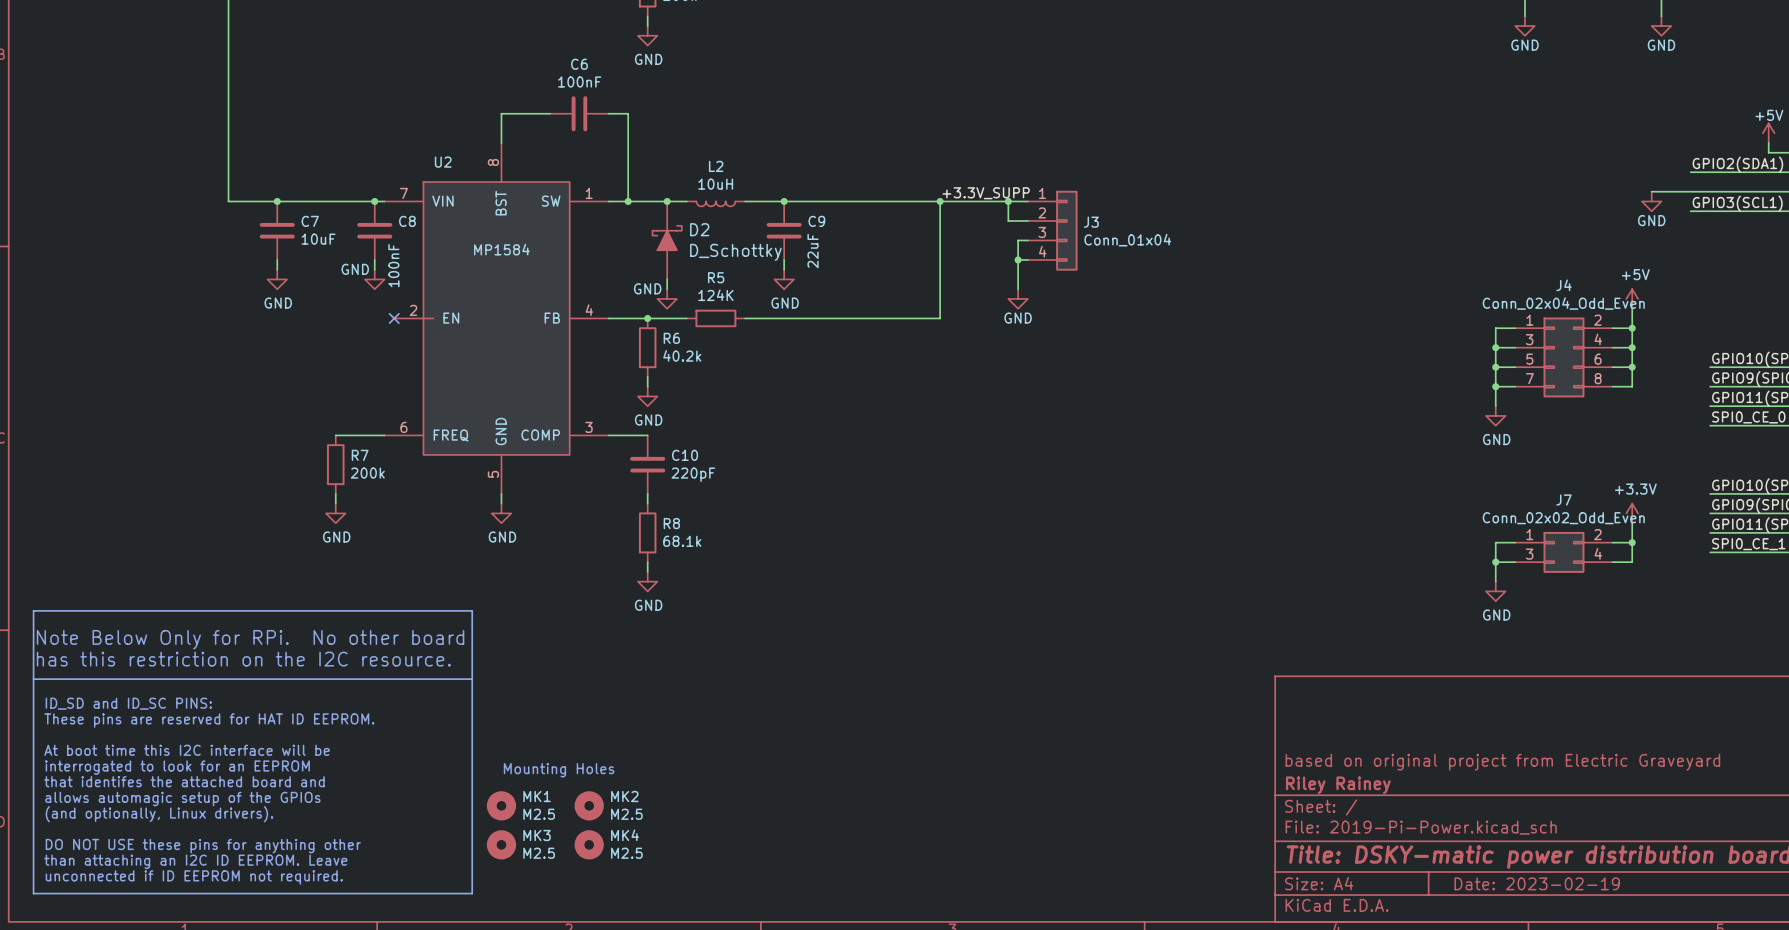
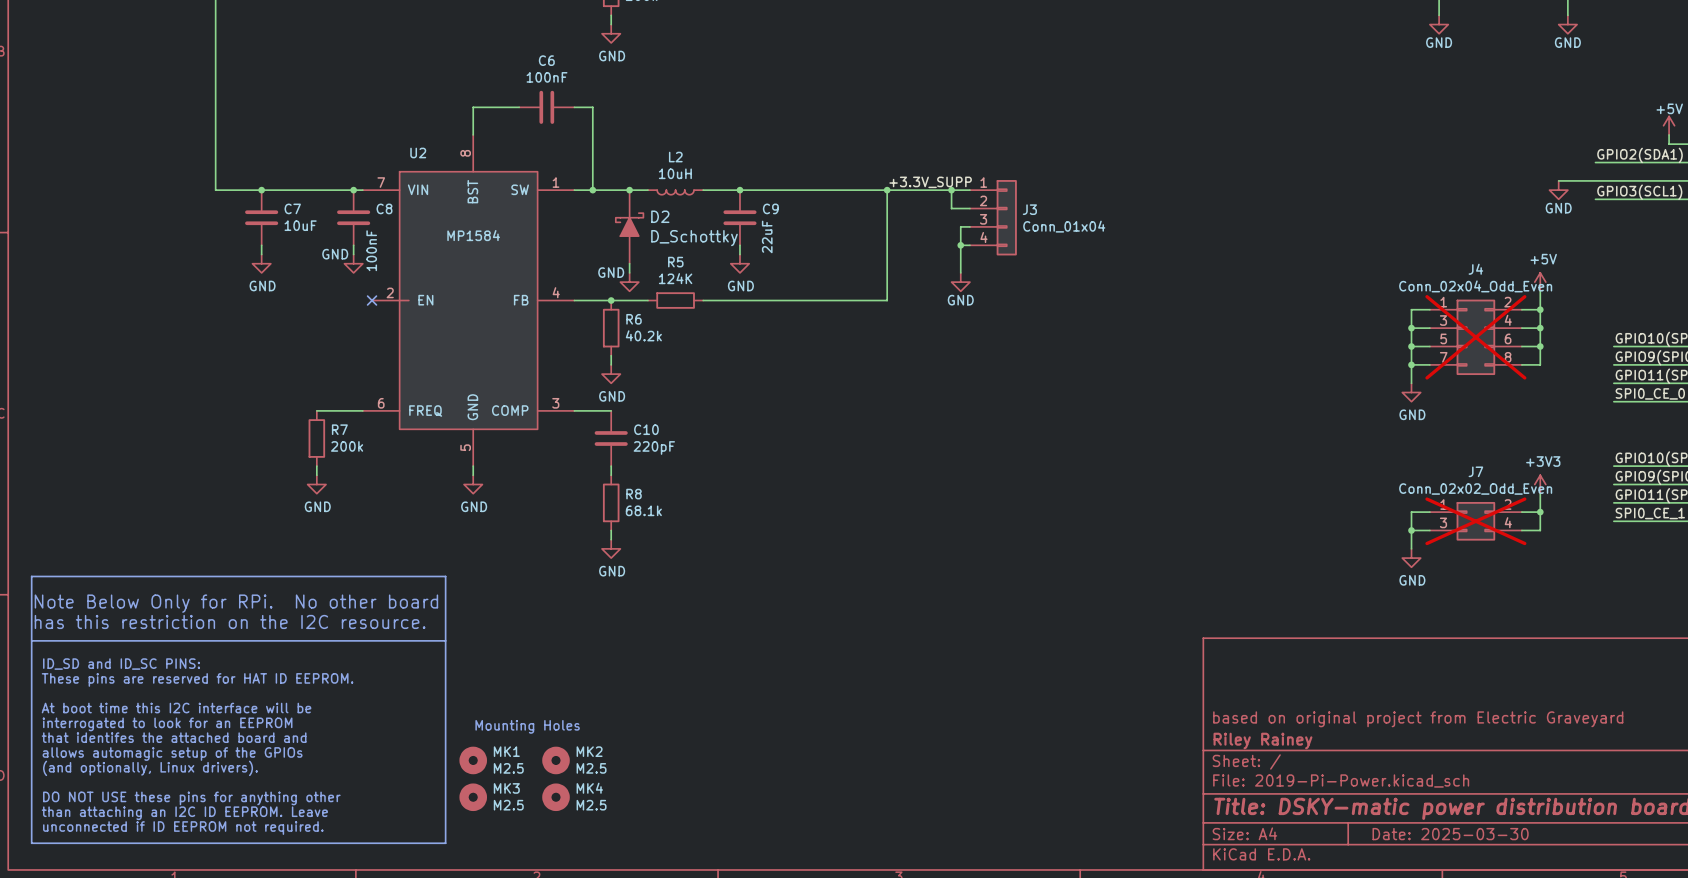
J4 do-not-place cross: none -> (1475, 337)
power symbol: +3.3V (1632, 513) -> +3V3 (1540, 484)
J7 do-not-place cross: none -> (1475, 521)
title block: Date: 2023-02-19 (1537, 883) -> Date: 2025-03-30 (1450, 834)

